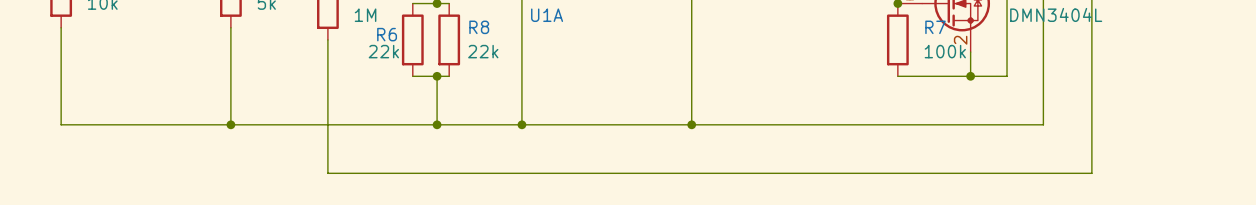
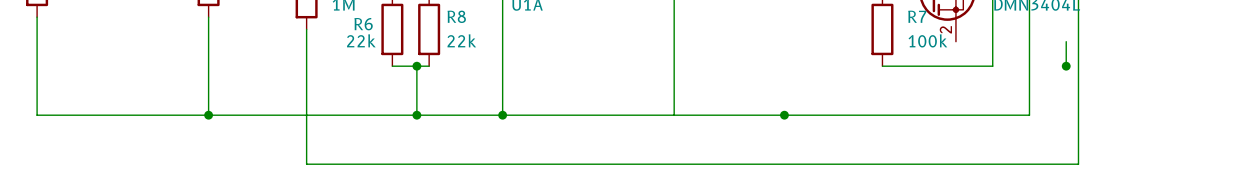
wire: (970, 52) (970, 76) -> (1066, 41) (1066, 66)
junction: (970, 76) -> none
junction: none -> (1066, 66)
junction: (691, 124) -> none
junction: none -> (784, 115)

